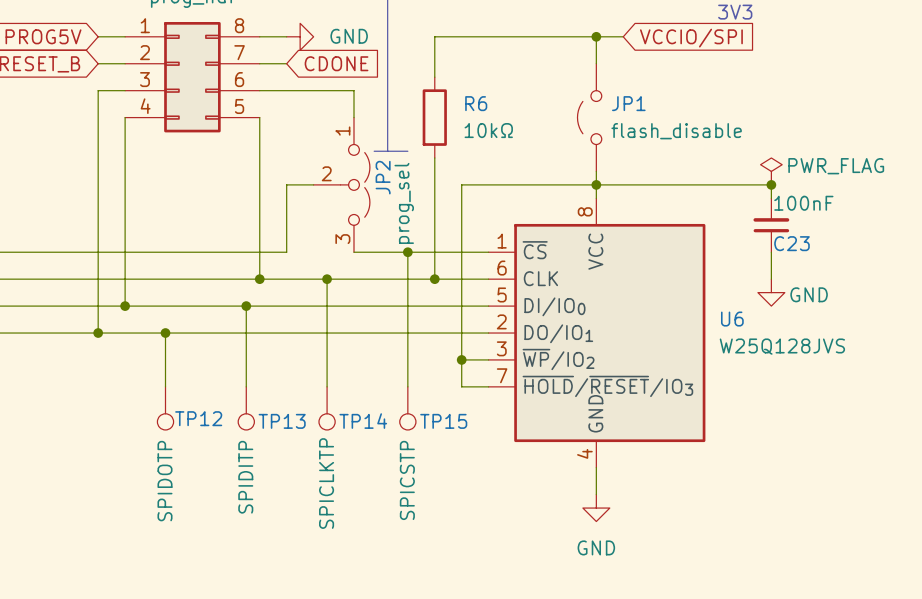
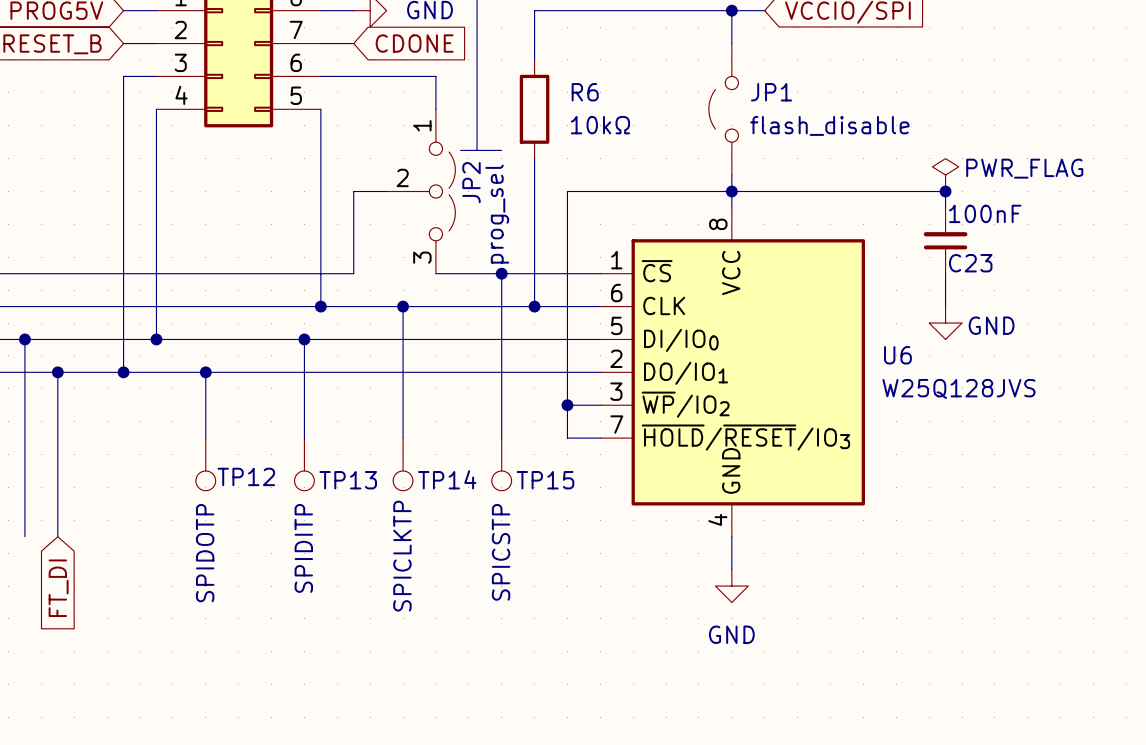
wire: none -> (24, 339) (24, 536)
junction: none -> (24, 339)
wire: none -> (57, 372) (57, 536)
junction: none -> (57, 372)
global label: none -> FT_DI (58, 588)

